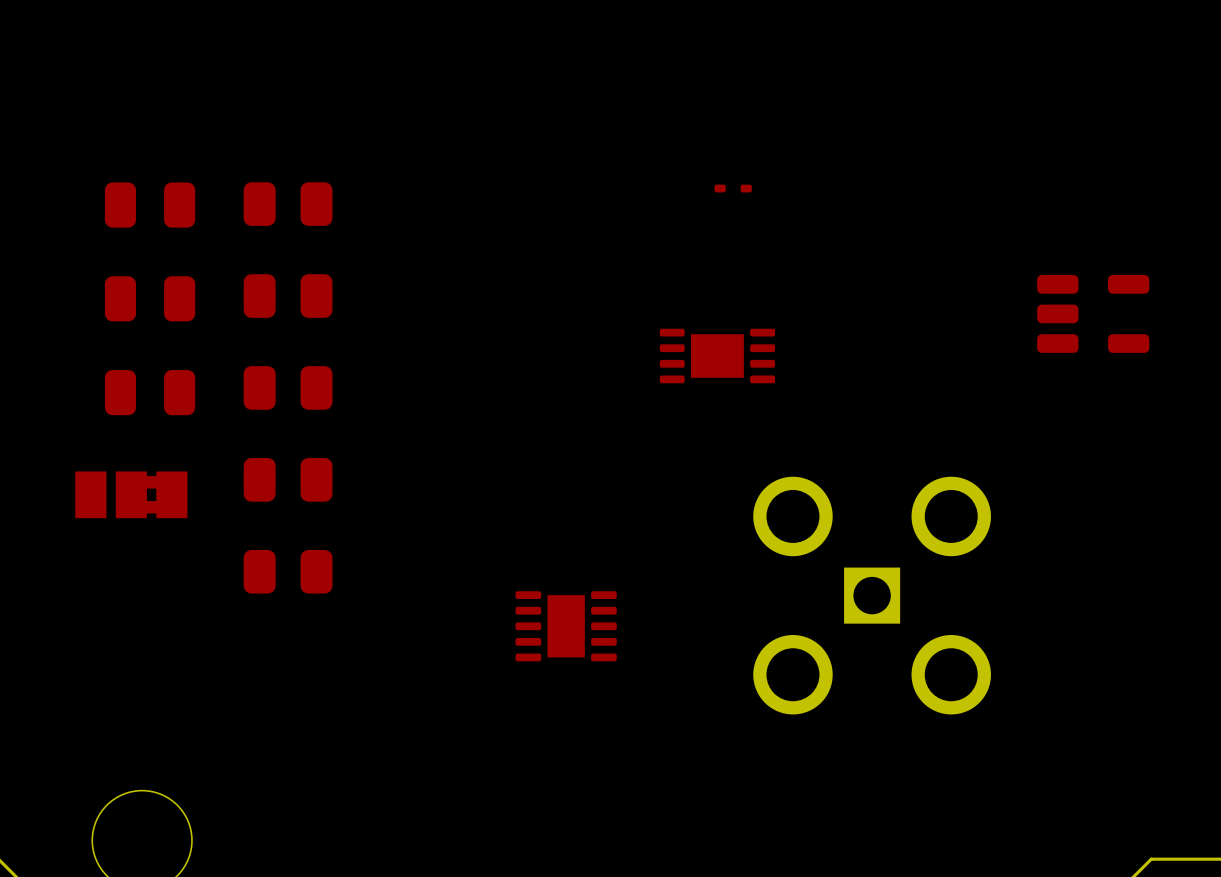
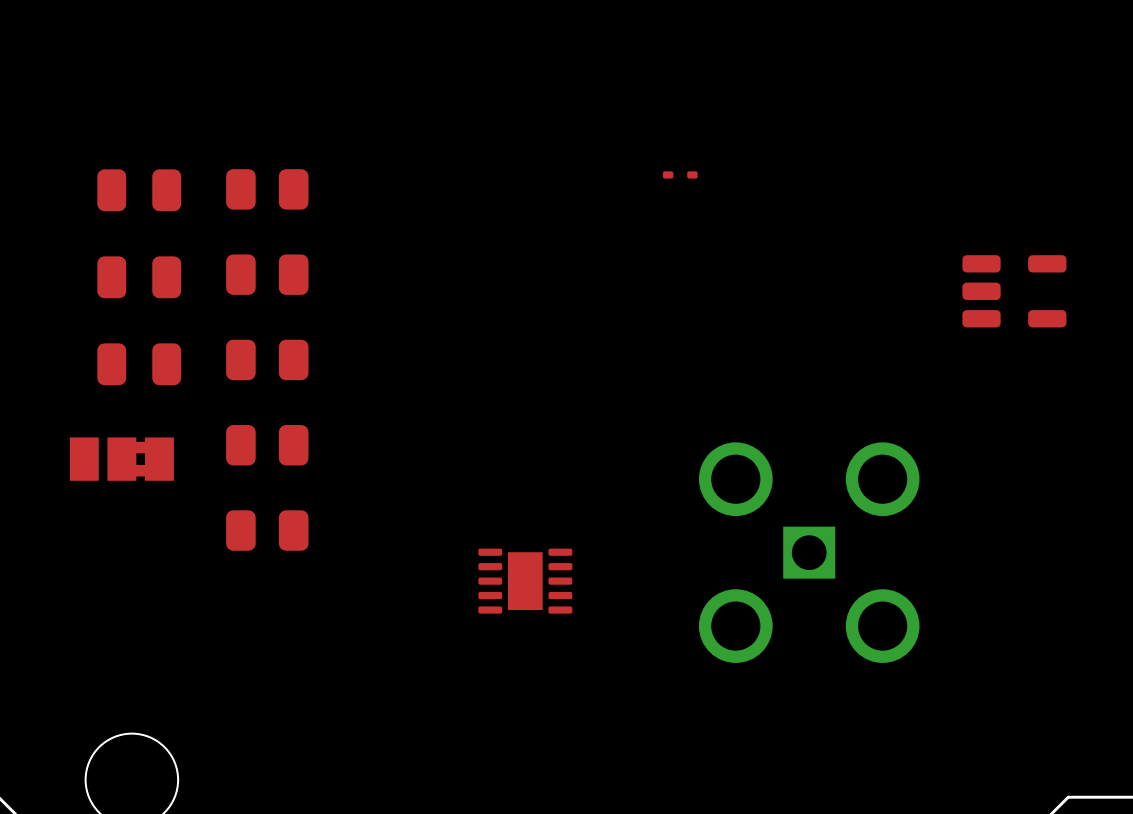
part: (717, 356) -> none

